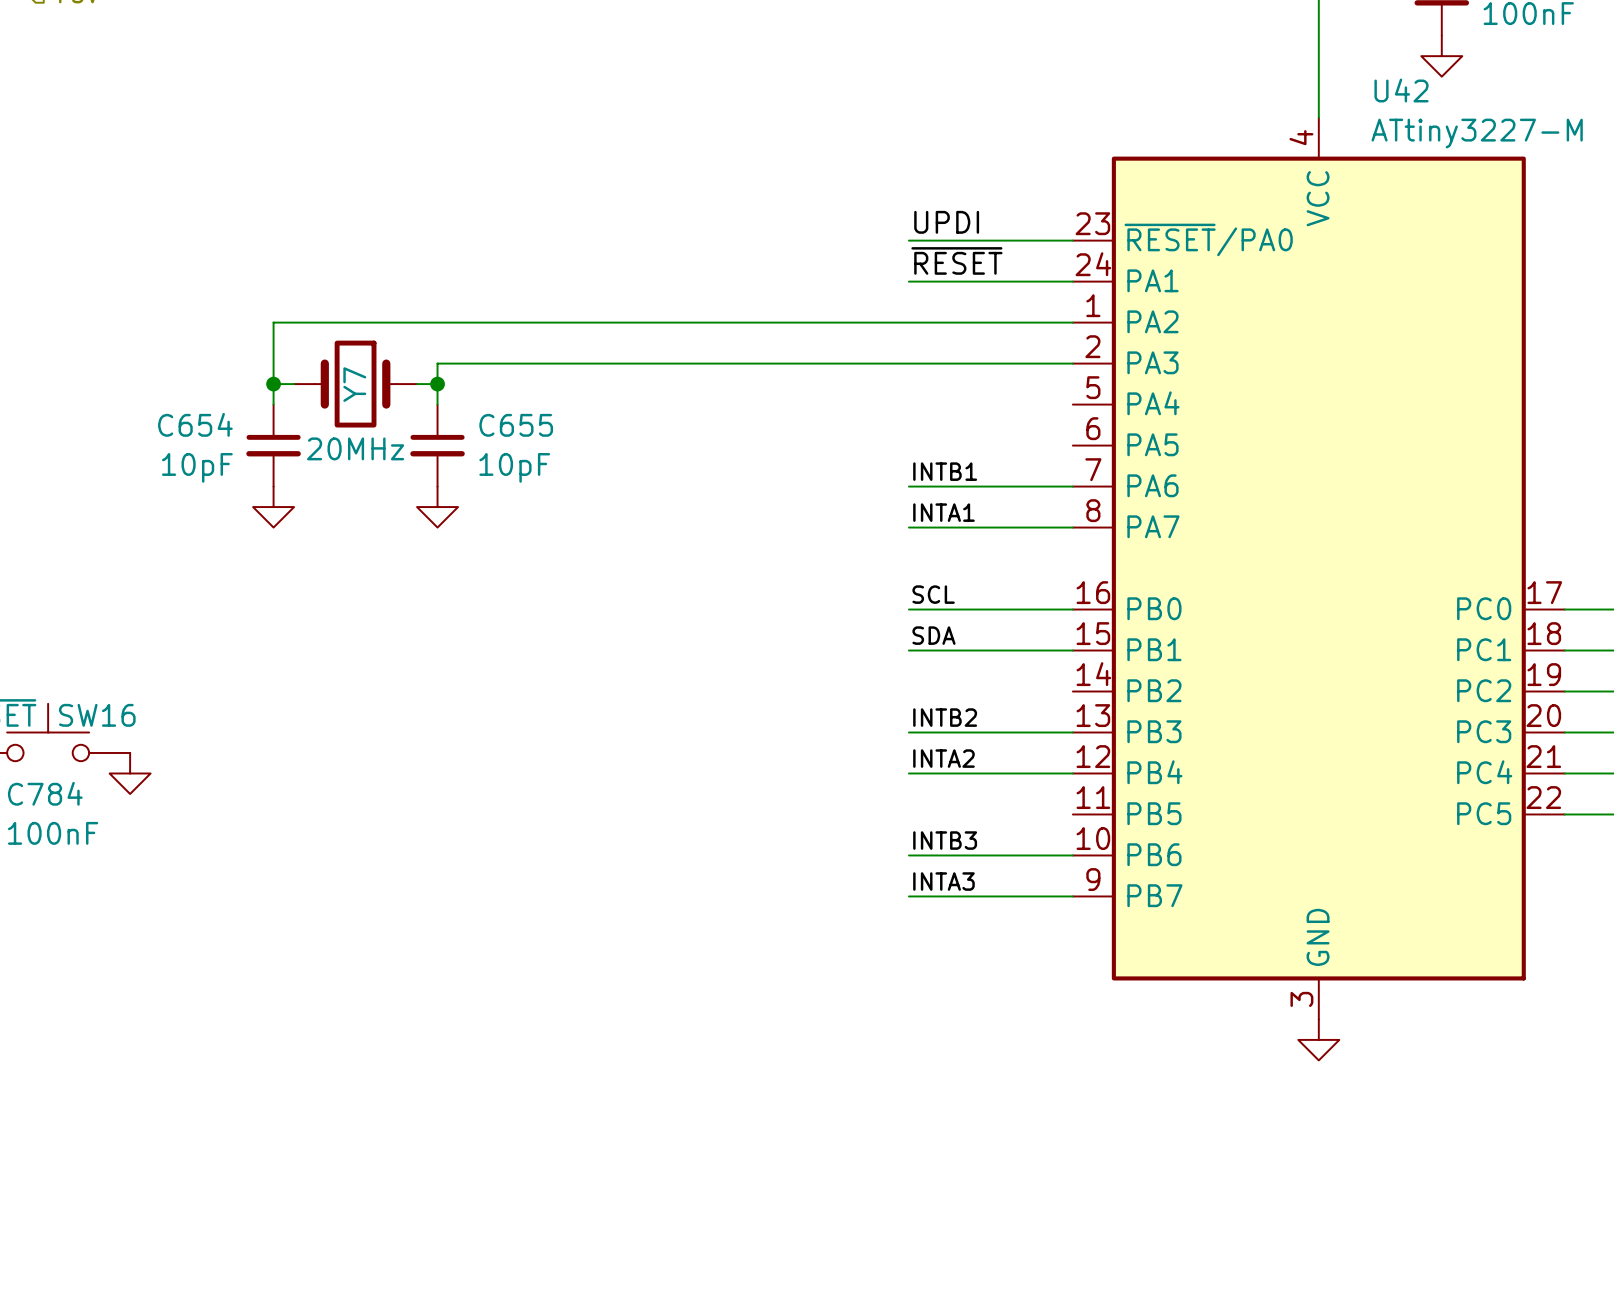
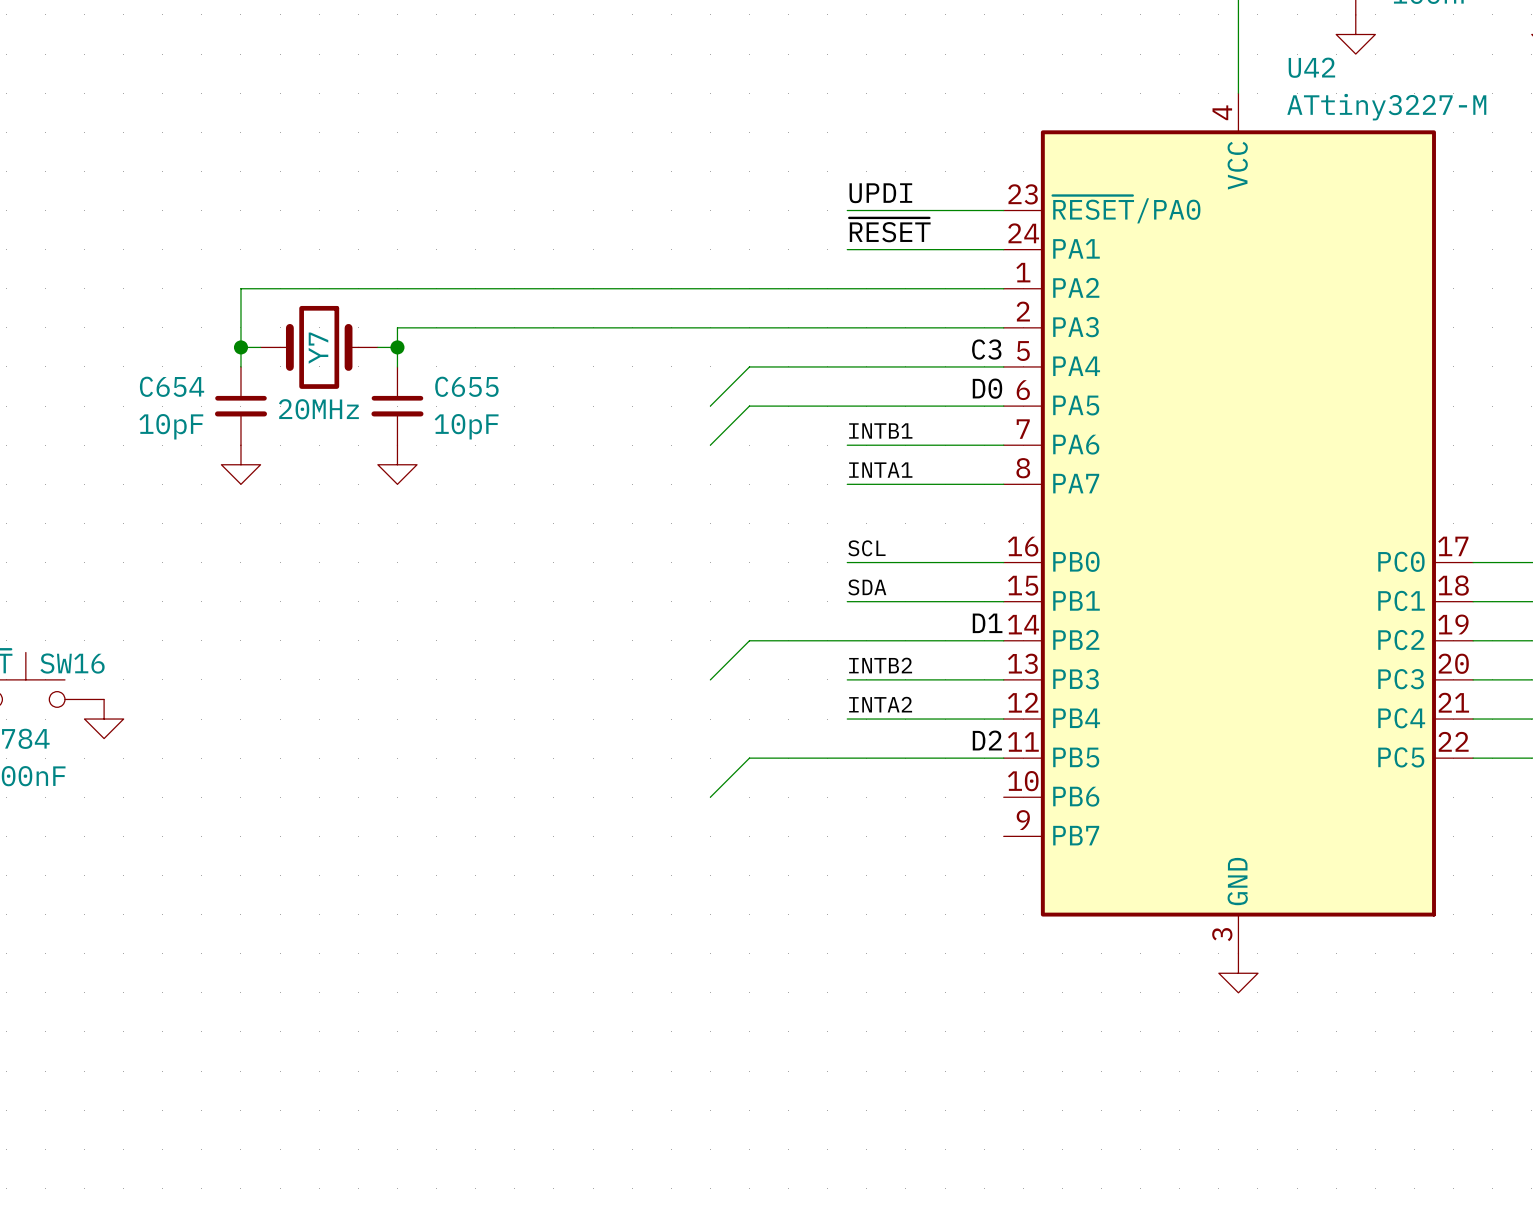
label: none -> C3 (986, 349)
wire: none -> (1003, 366) (749, 366) (710, 406)
label: none -> D0 (987, 388)
wire: none -> (1003, 406) (749, 406) (710, 445)
label: none -> D1 (987, 623)
wire: none -> (1003, 640) (749, 640) (710, 679)
label: none -> D2 (987, 740)
wire: none -> (1003, 758) (749, 758) (710, 797)
label: INTB3 (945, 840) -> none
wire: (908, 855) (1072, 855) -> none
label: INTA3 (943, 881) -> none
wire: (908, 896) (1072, 896) -> none

